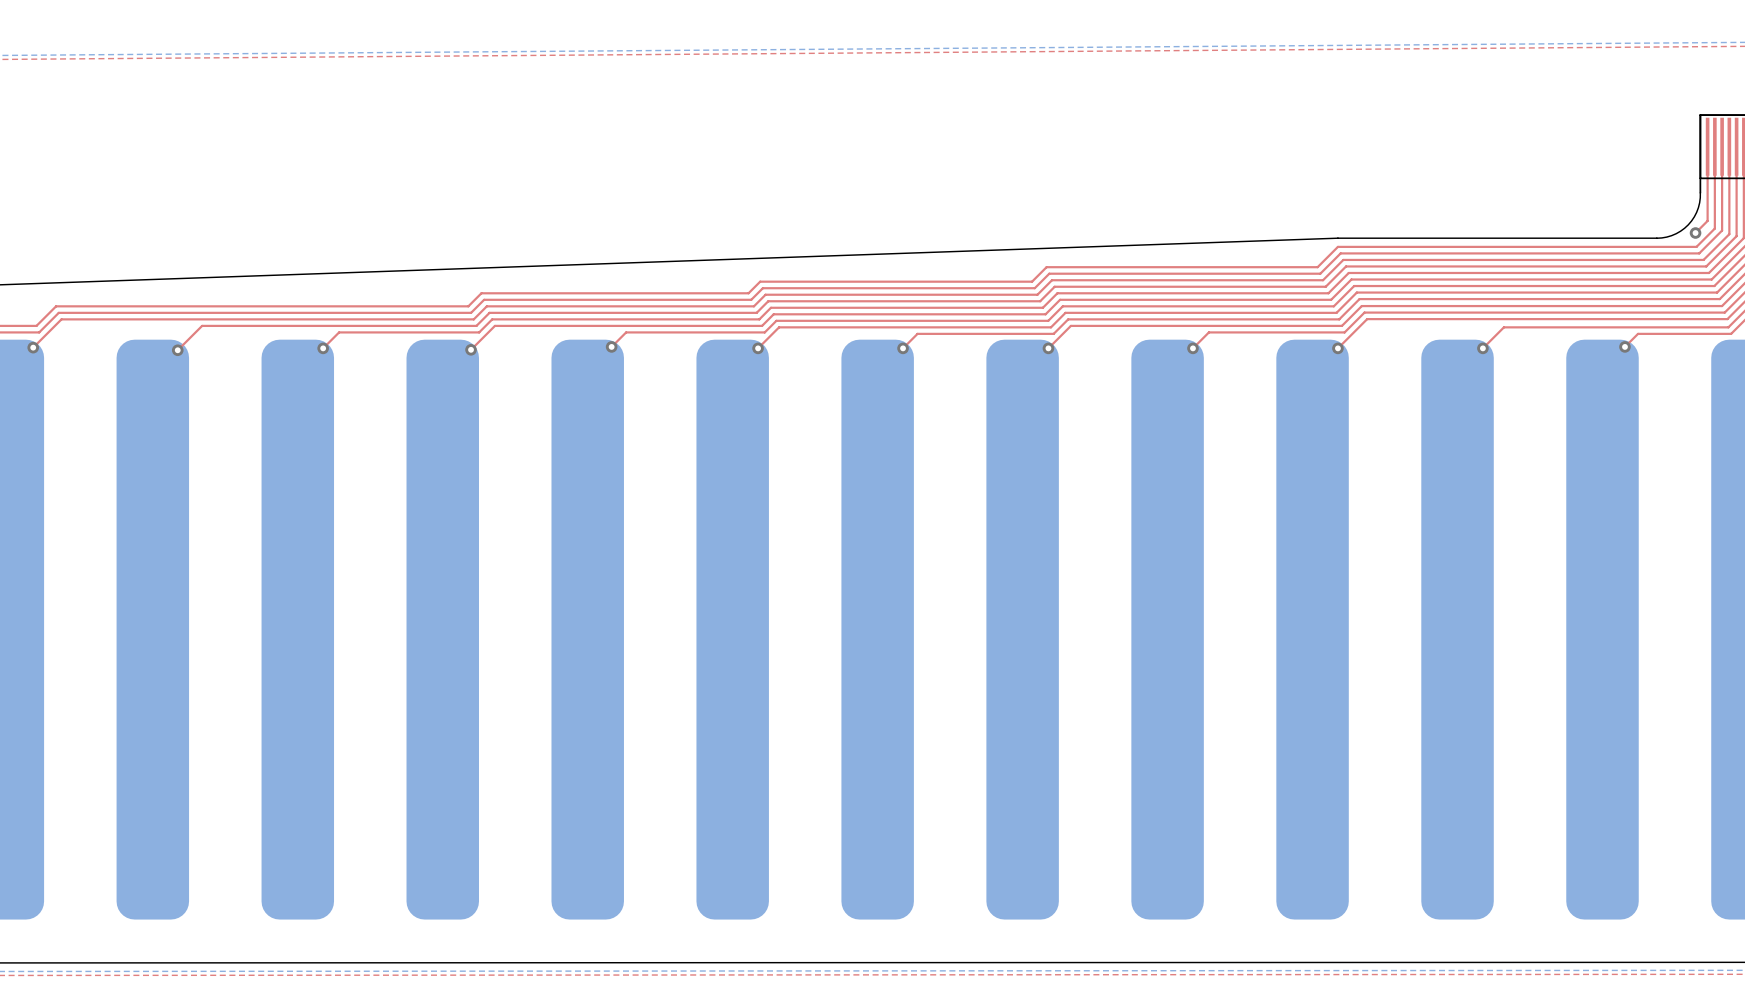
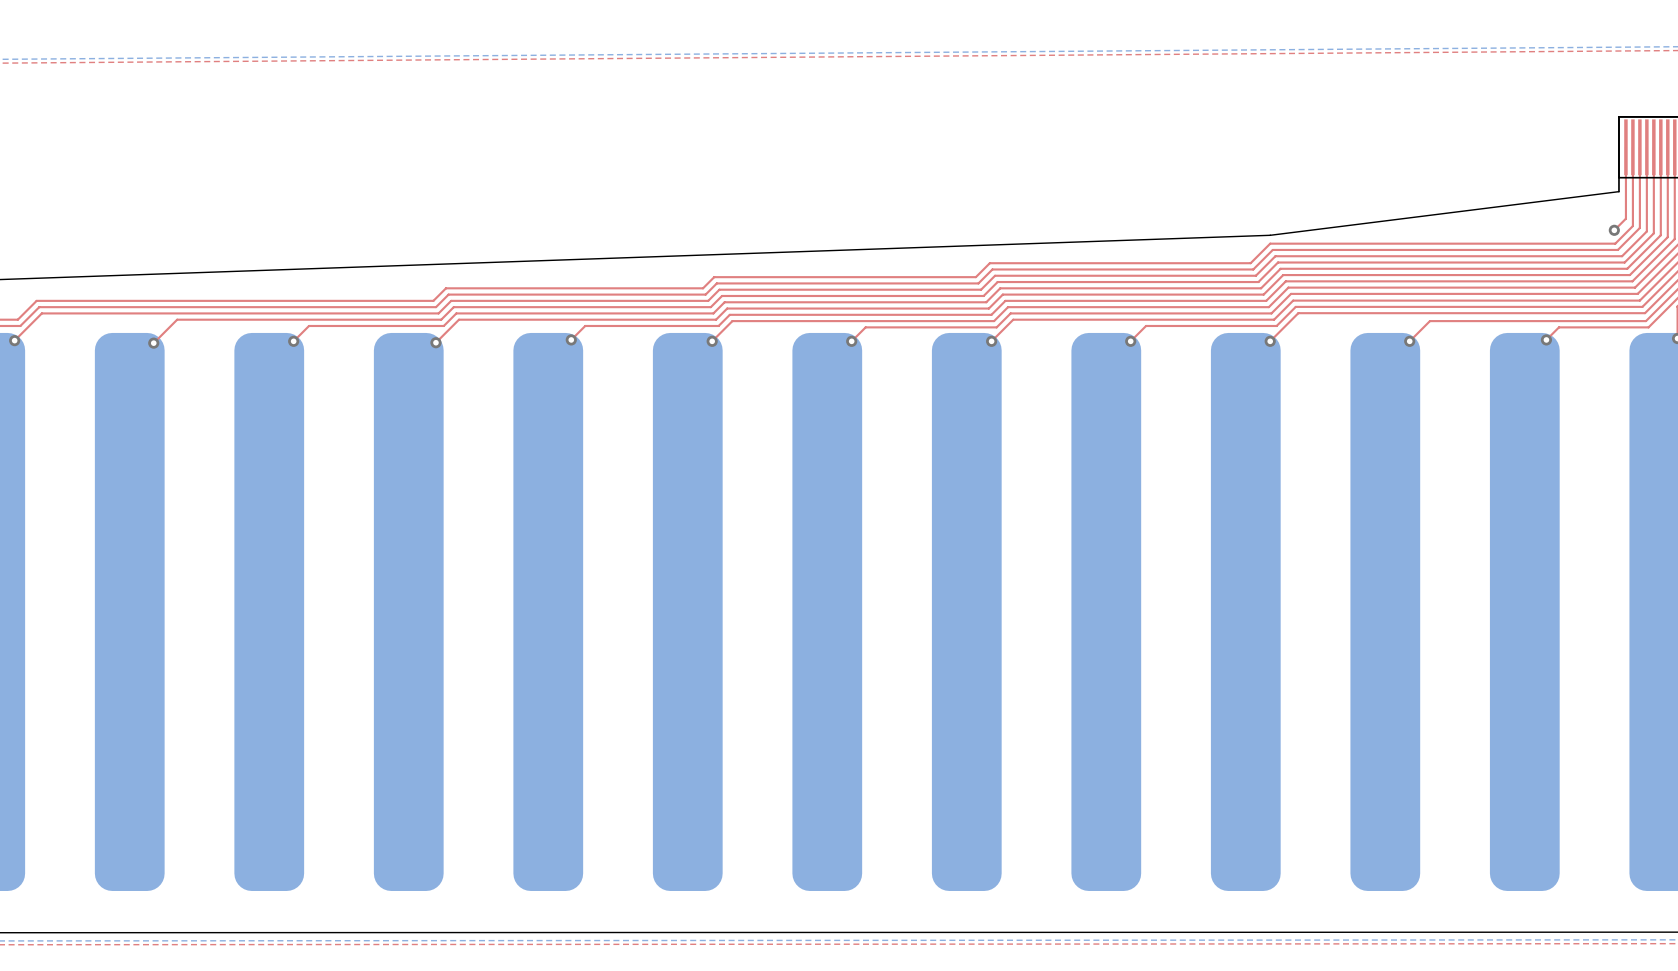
board edge: (1700, 192) (1698, 207) (1688, 224) (1676, 233) (1661, 237) (1337, 238) -> (1618, 191) (1270, 235)

